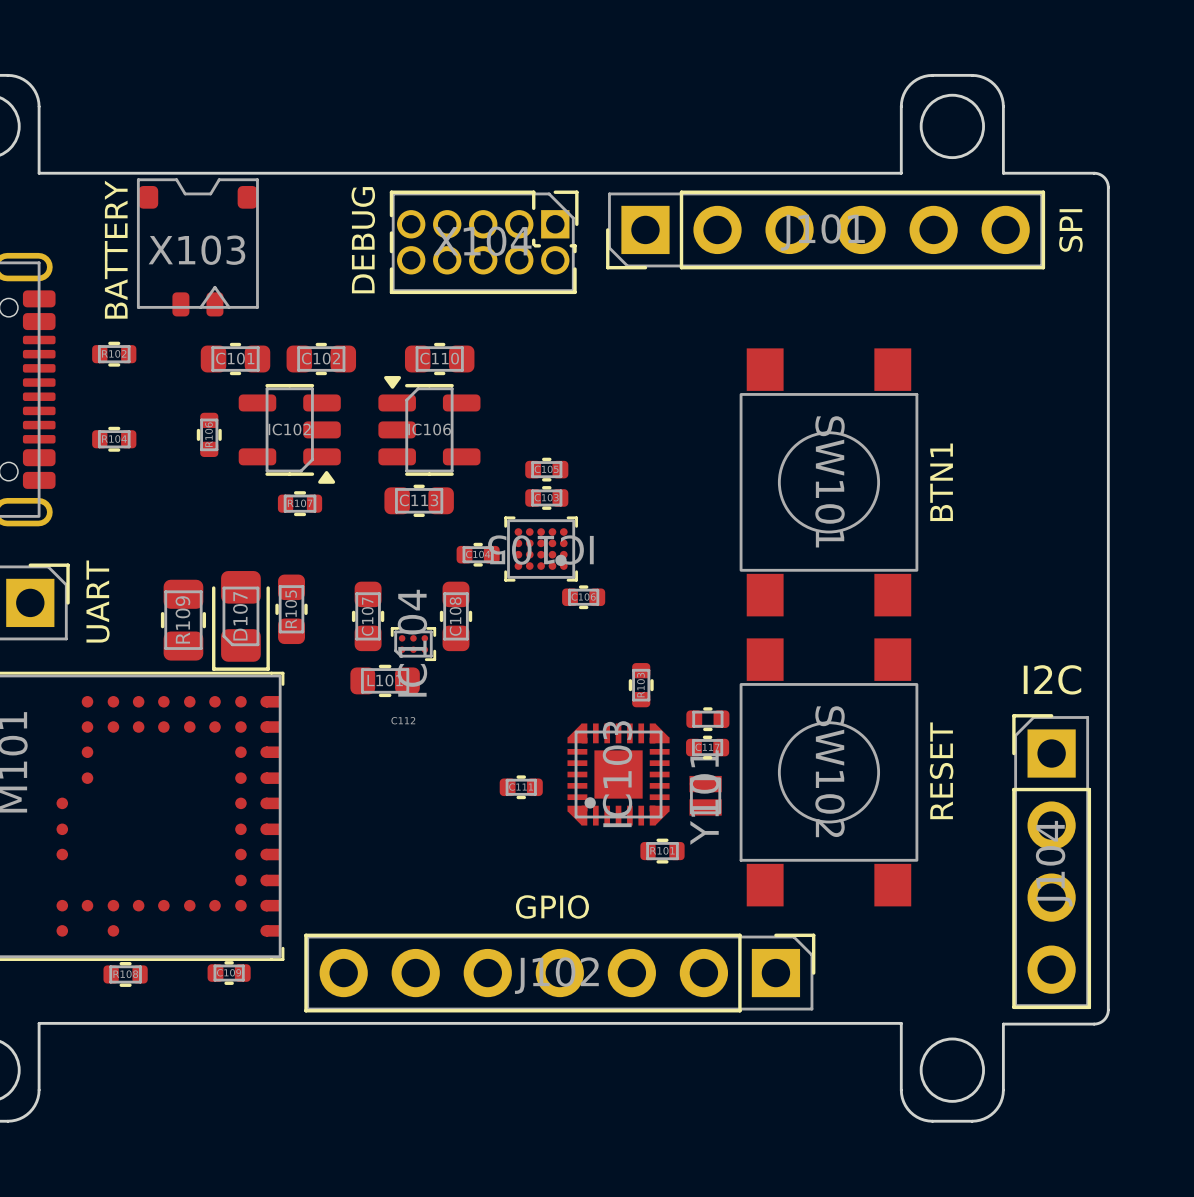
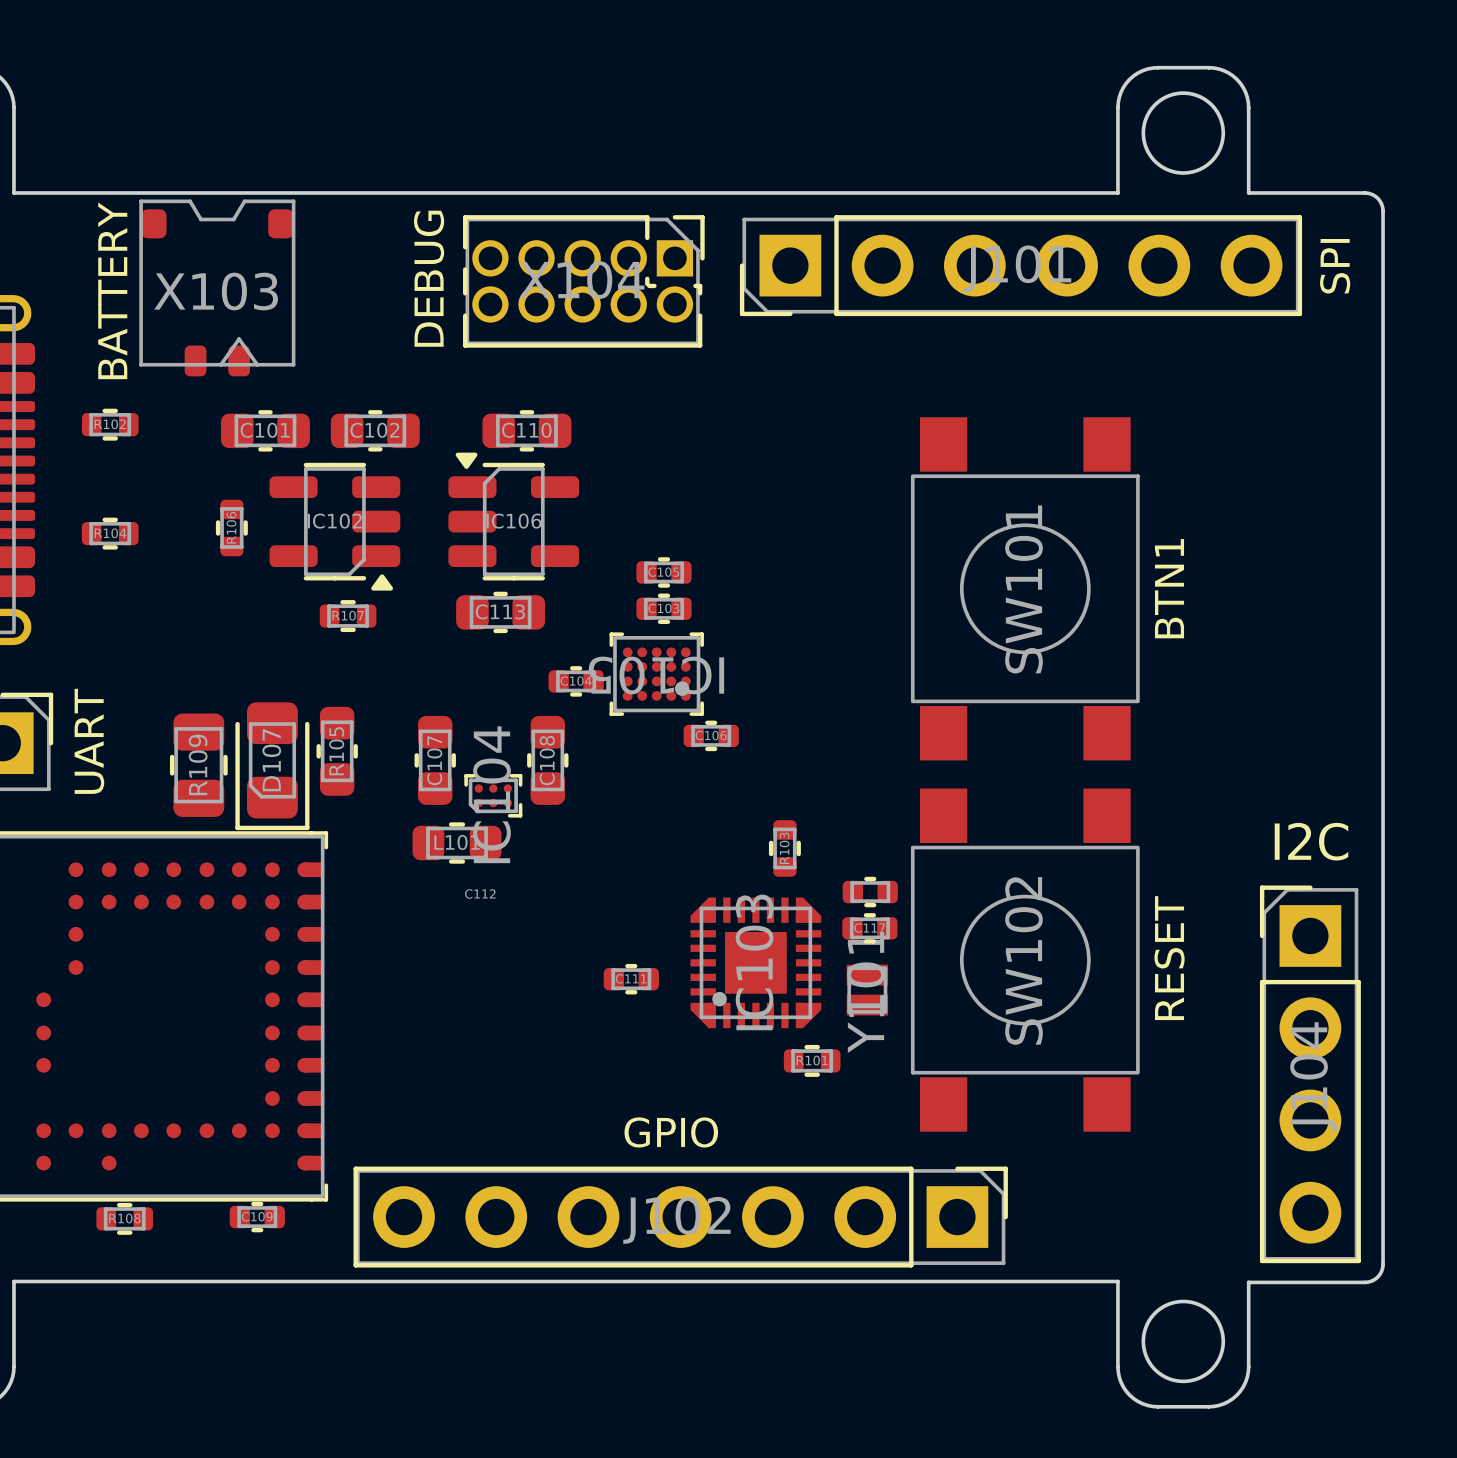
SW101 name rotation: 0° (830, 481) -> 180° (1024, 589)
SW102 name rotation: 0° (830, 771) -> 180° (1024, 960)

